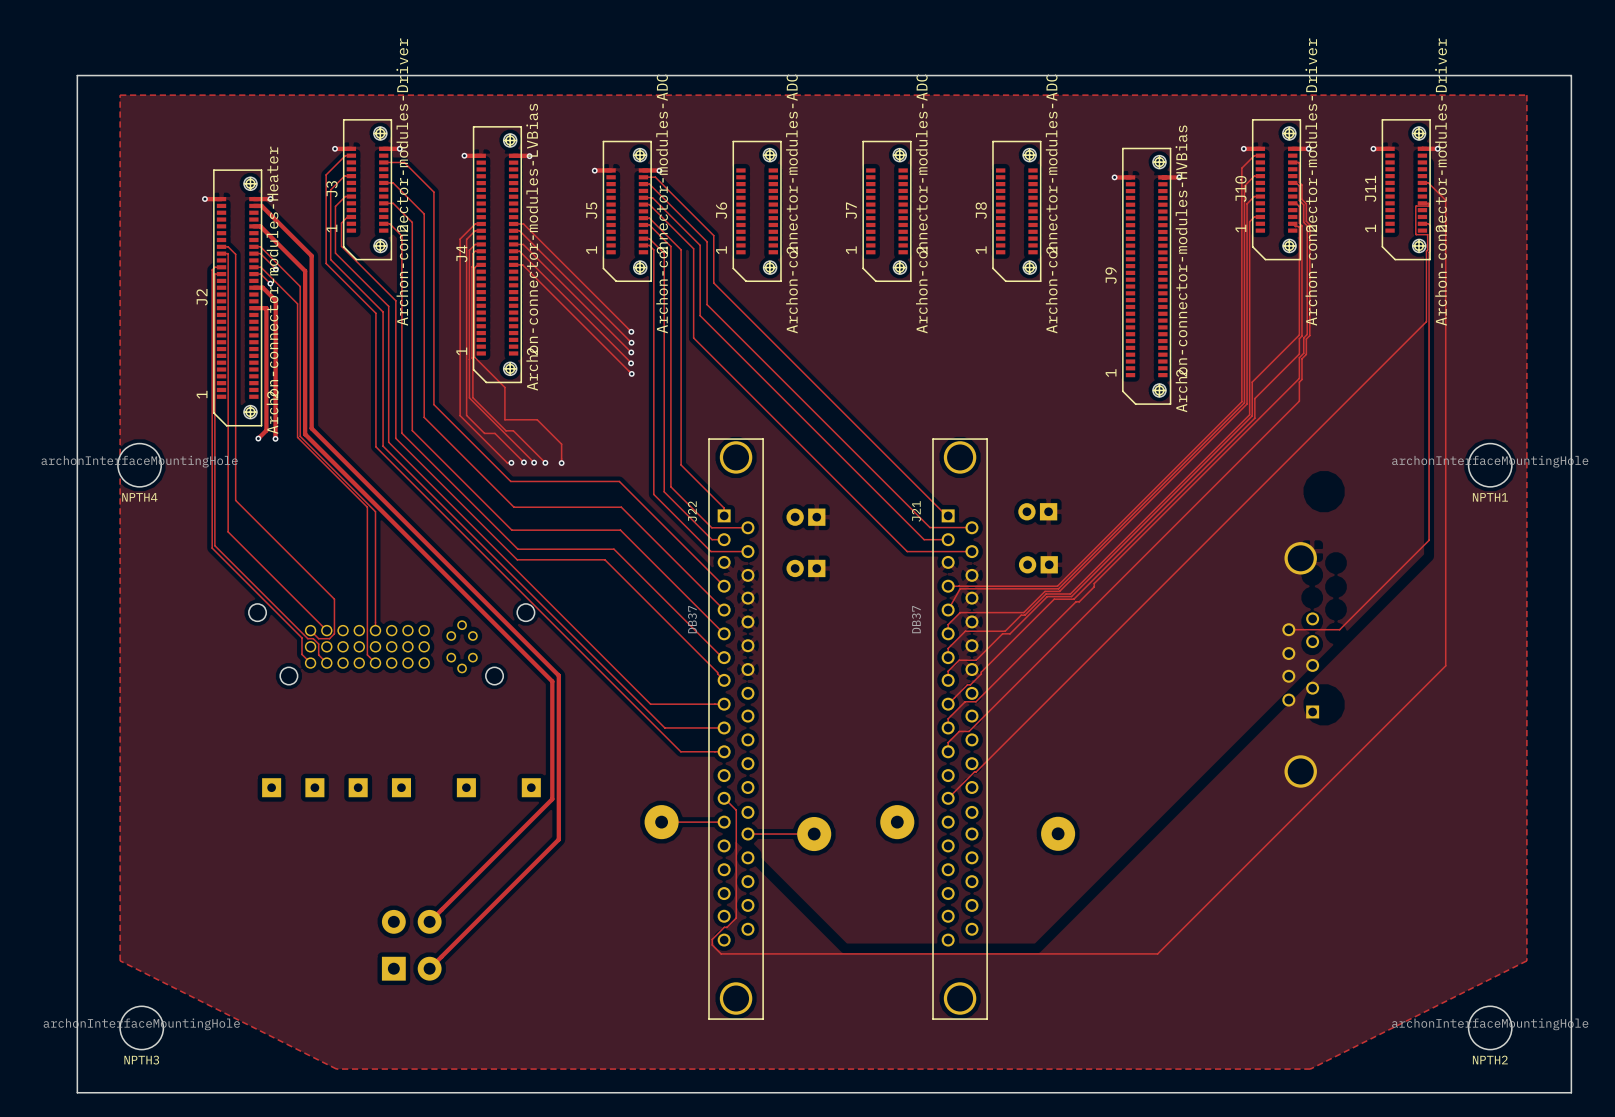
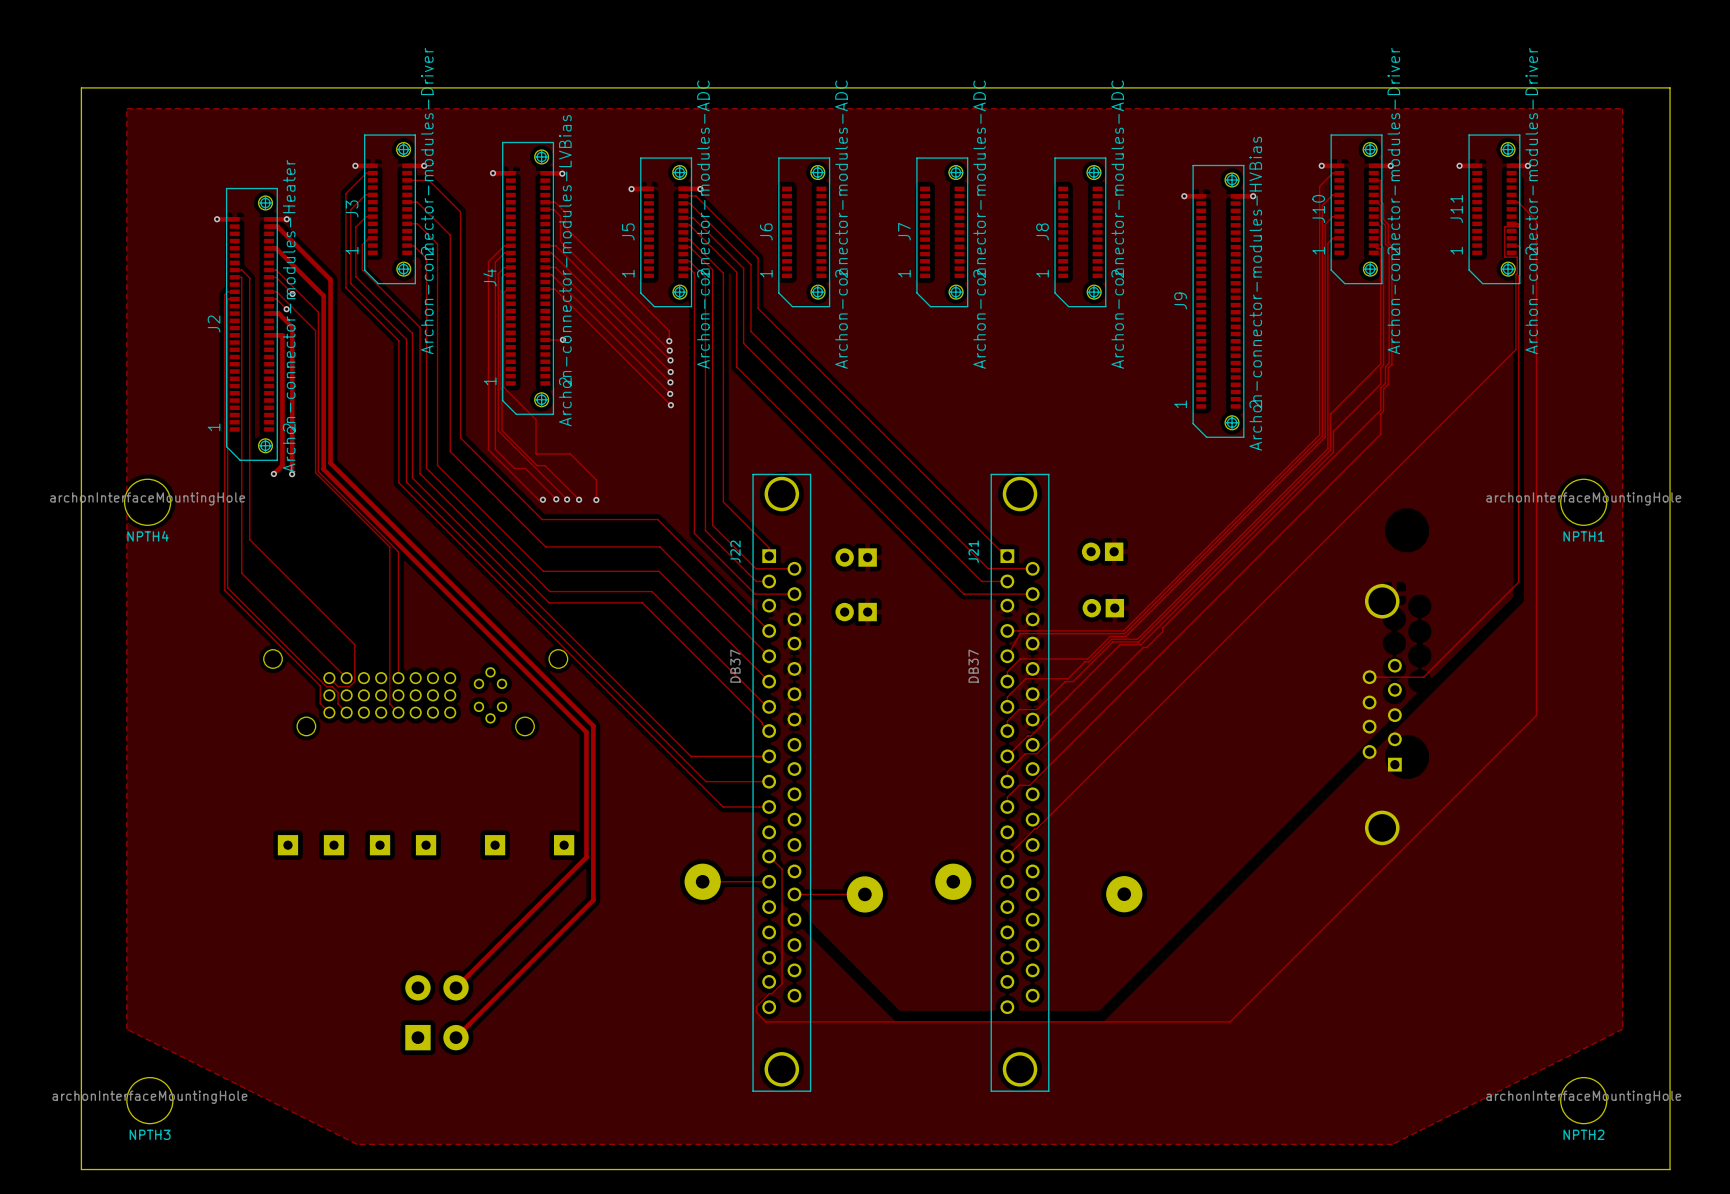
track: none -> (545, 202) (555, 202) (565, 212) (565, 227) (669, 331) (669, 341)
track: none -> (545, 209) (553, 209) (560, 216) (560, 241) (669, 350)
track: none -> (562, 339) (545, 339)
via: none -> (562, 339)
via: none -> (669, 341)
via: none -> (669, 350)

